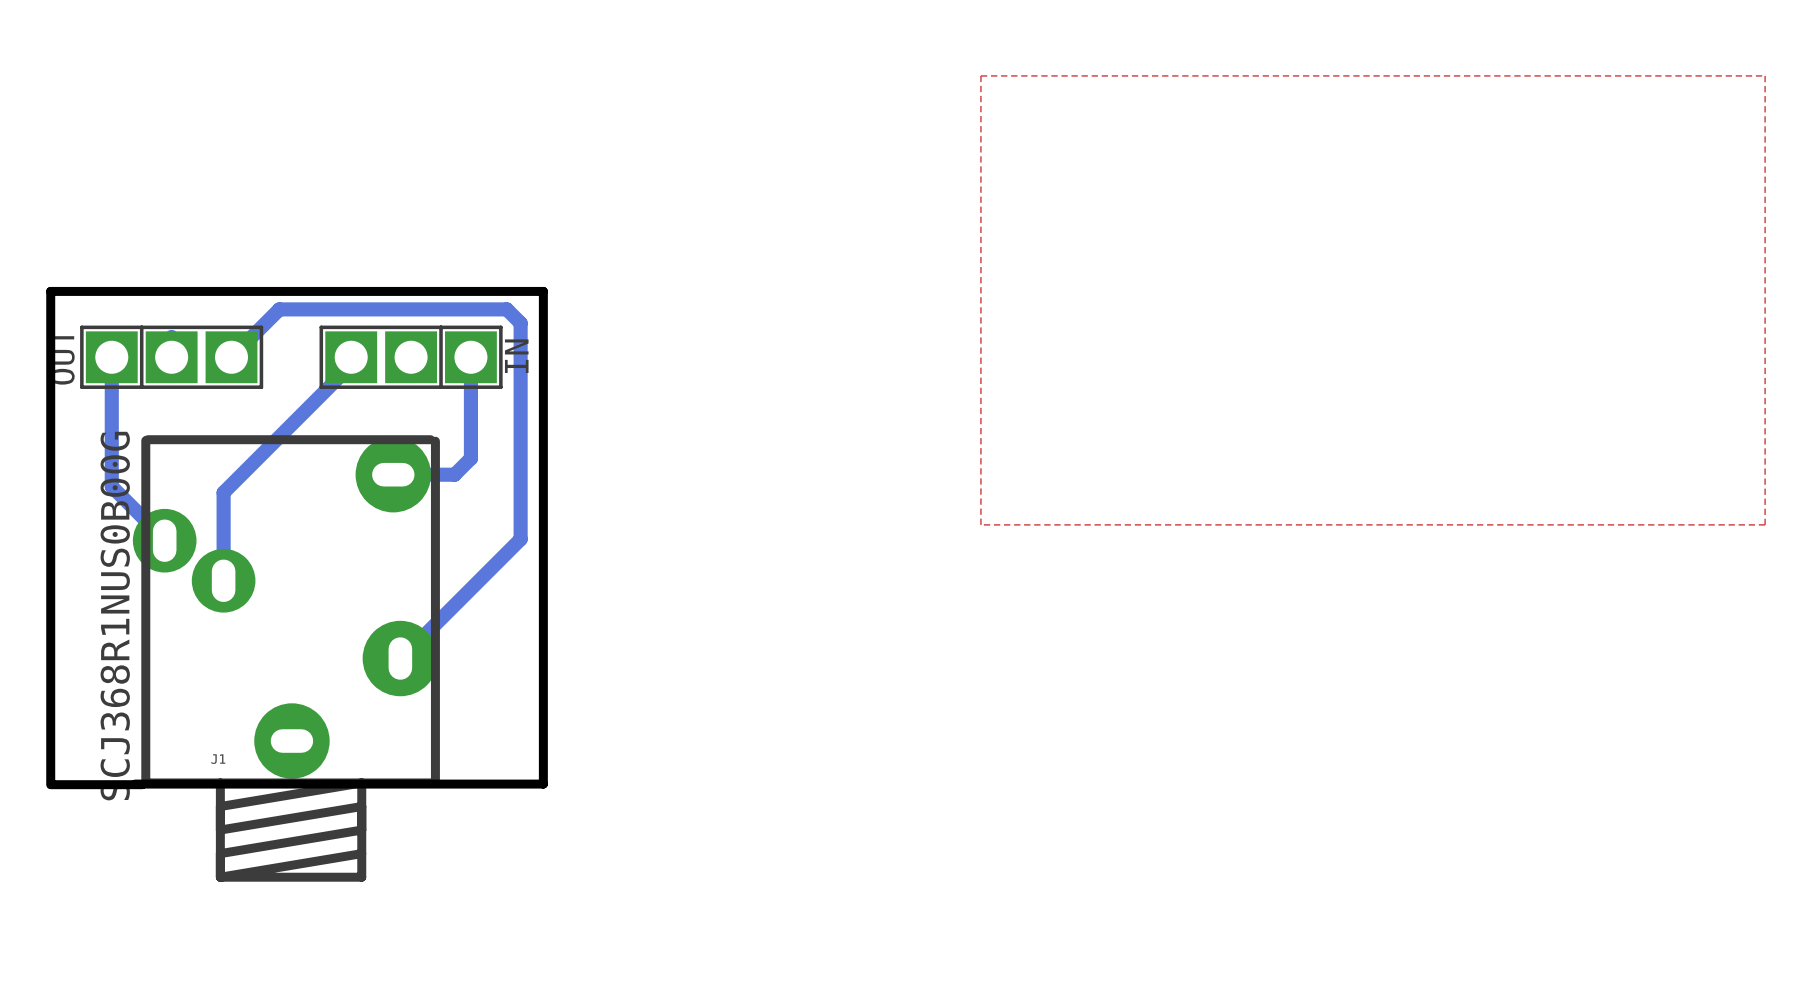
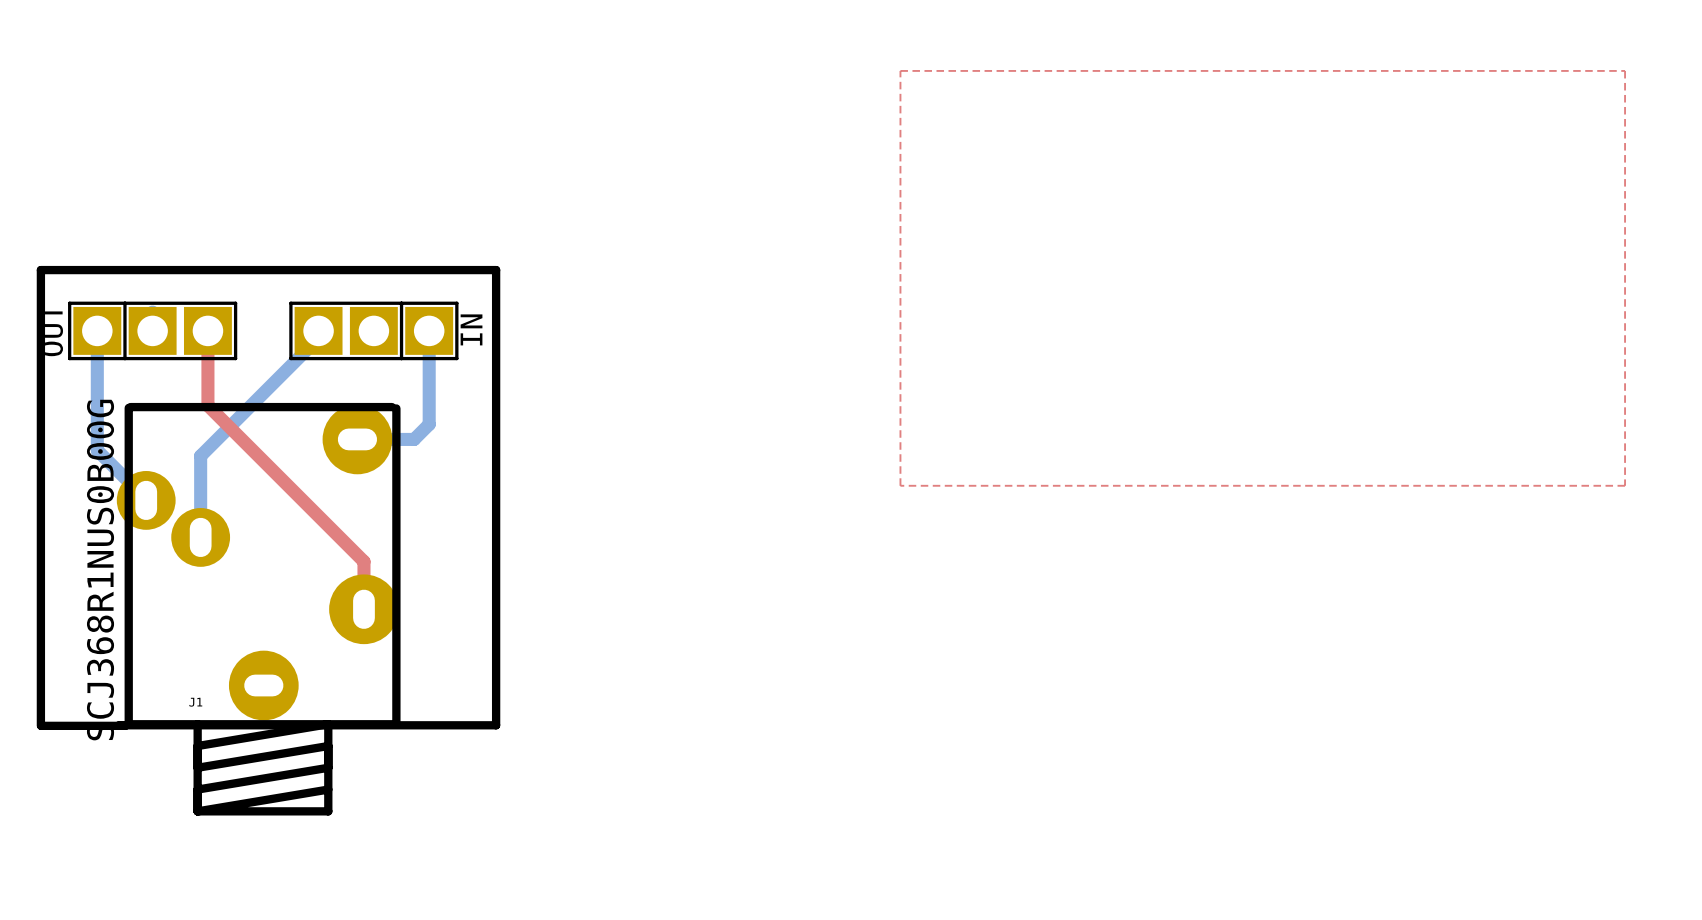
bottom track: (231, 357) (279, 309) (506, 309) (520, 323) (520, 539) (401, 658) -> none
top track: none -> (207, 330) (207, 405) (363, 561) (363, 609)

